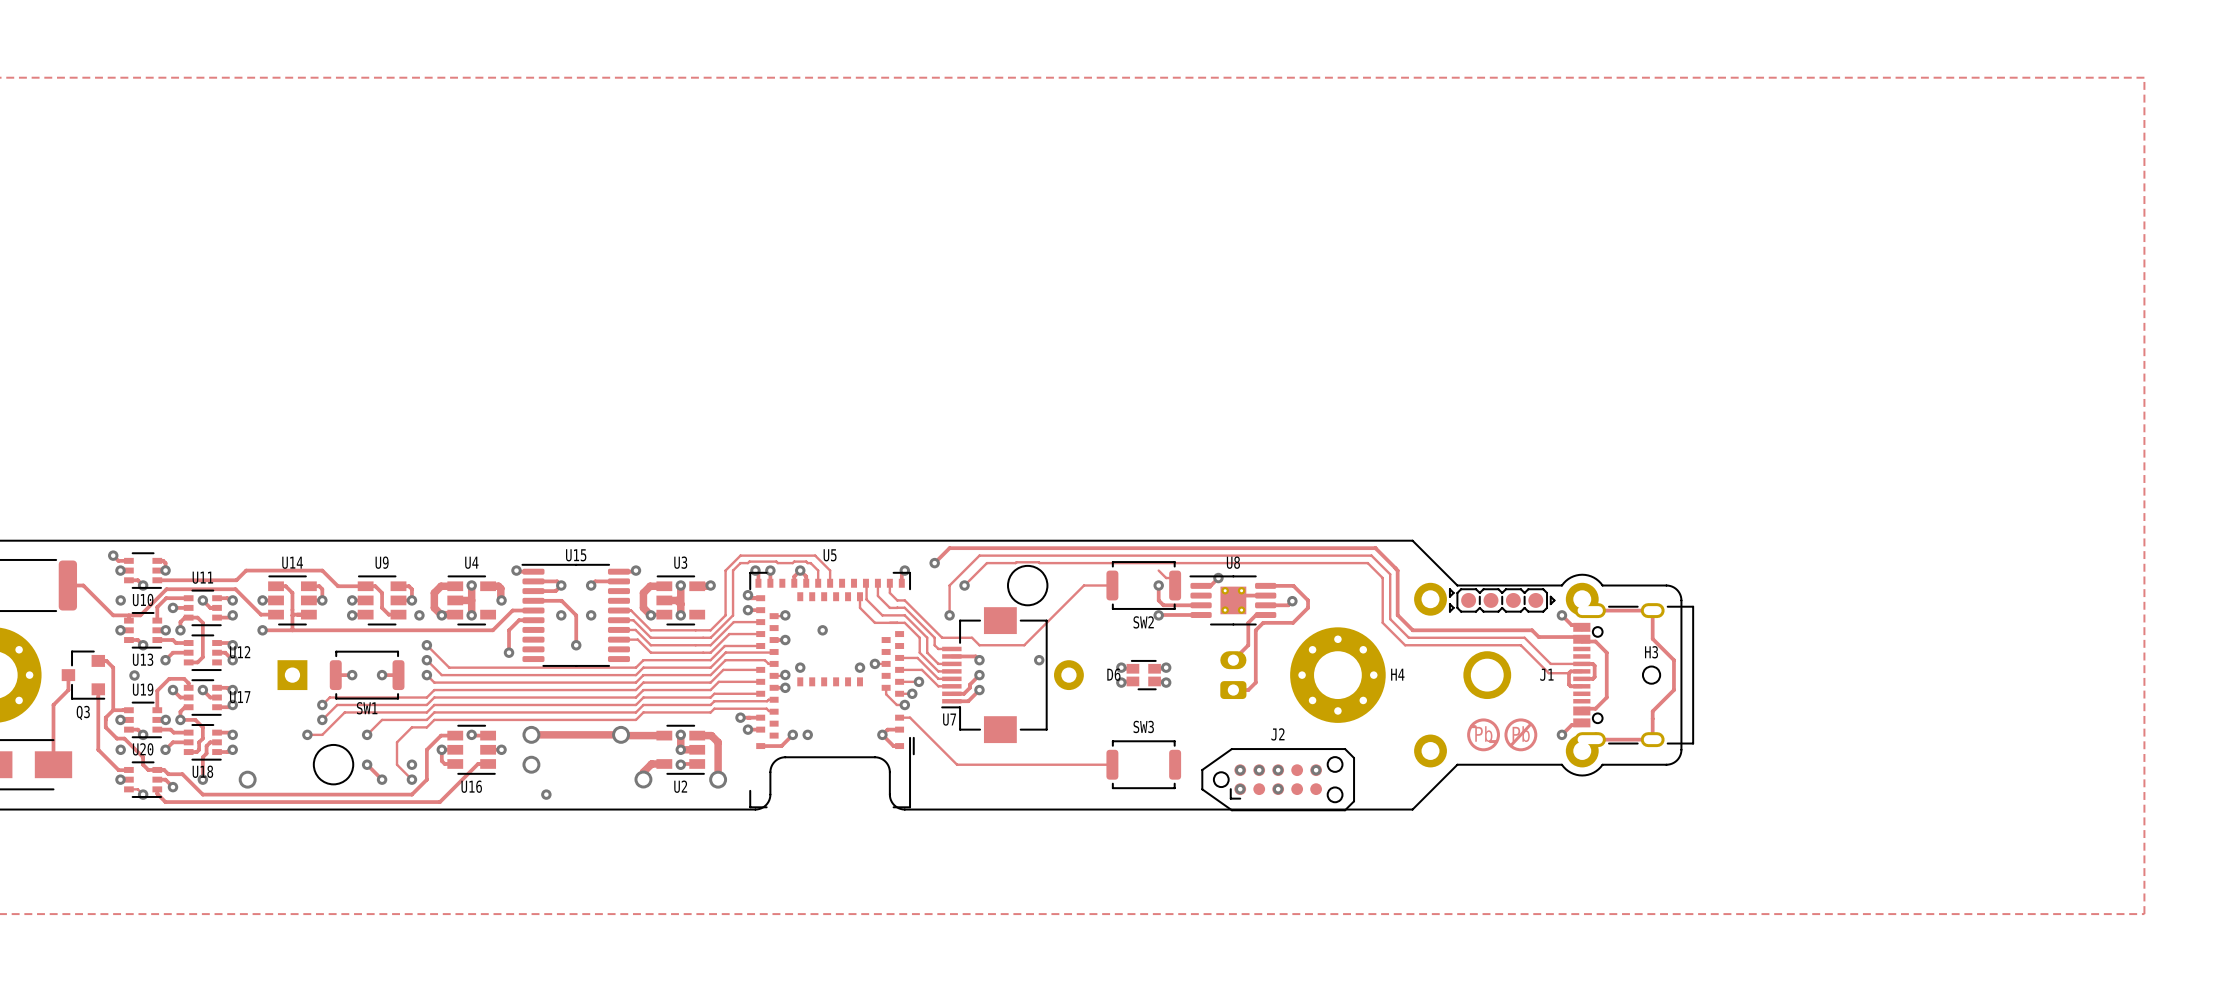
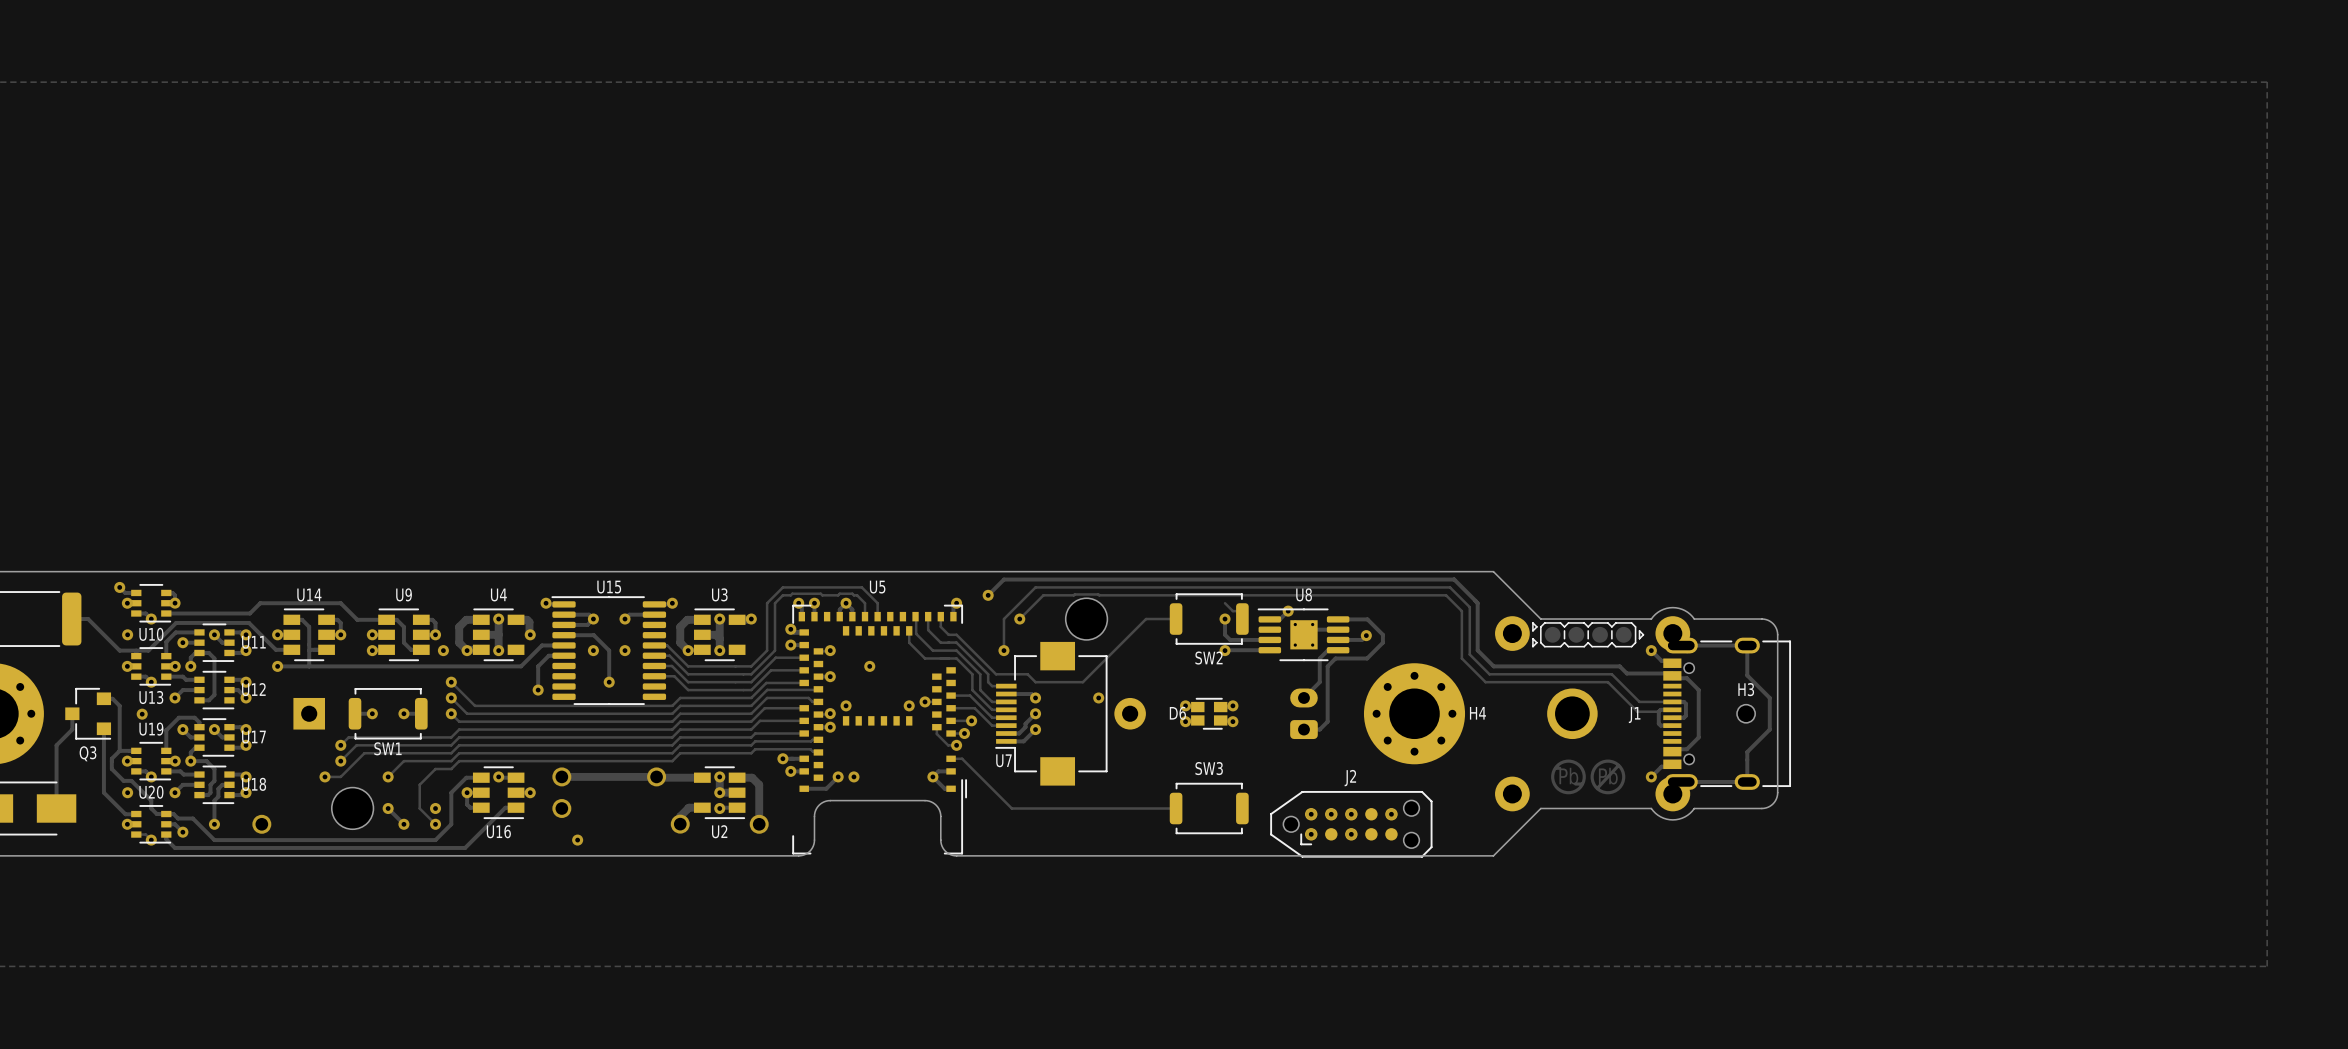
U11 name position: U11 (202, 577) -> U11 (253, 642)
U18 name position: U18 (202, 771) -> U18 (254, 784)

